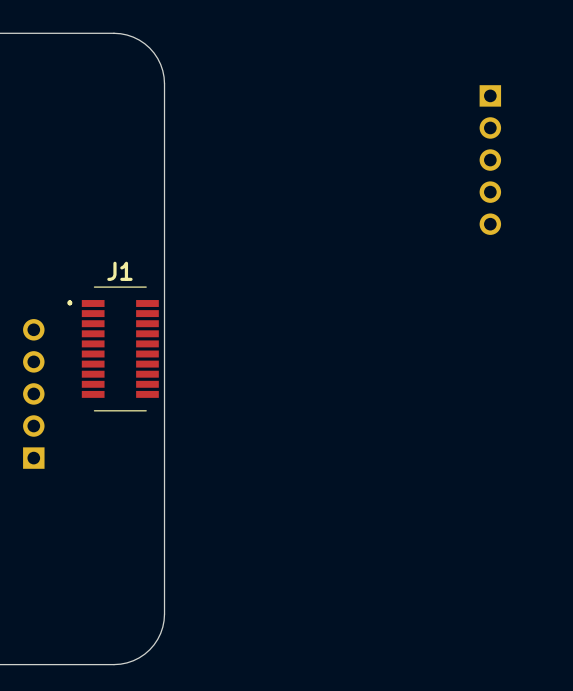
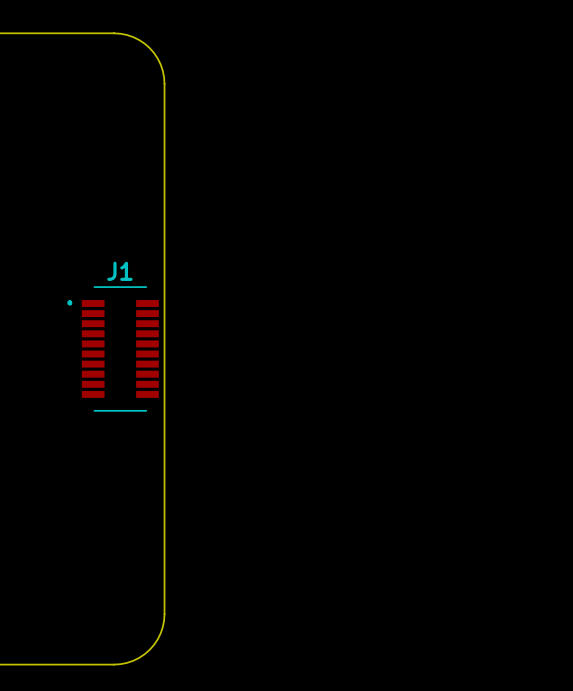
part: (490, 160) -> none
part: (33, 393) -> none

